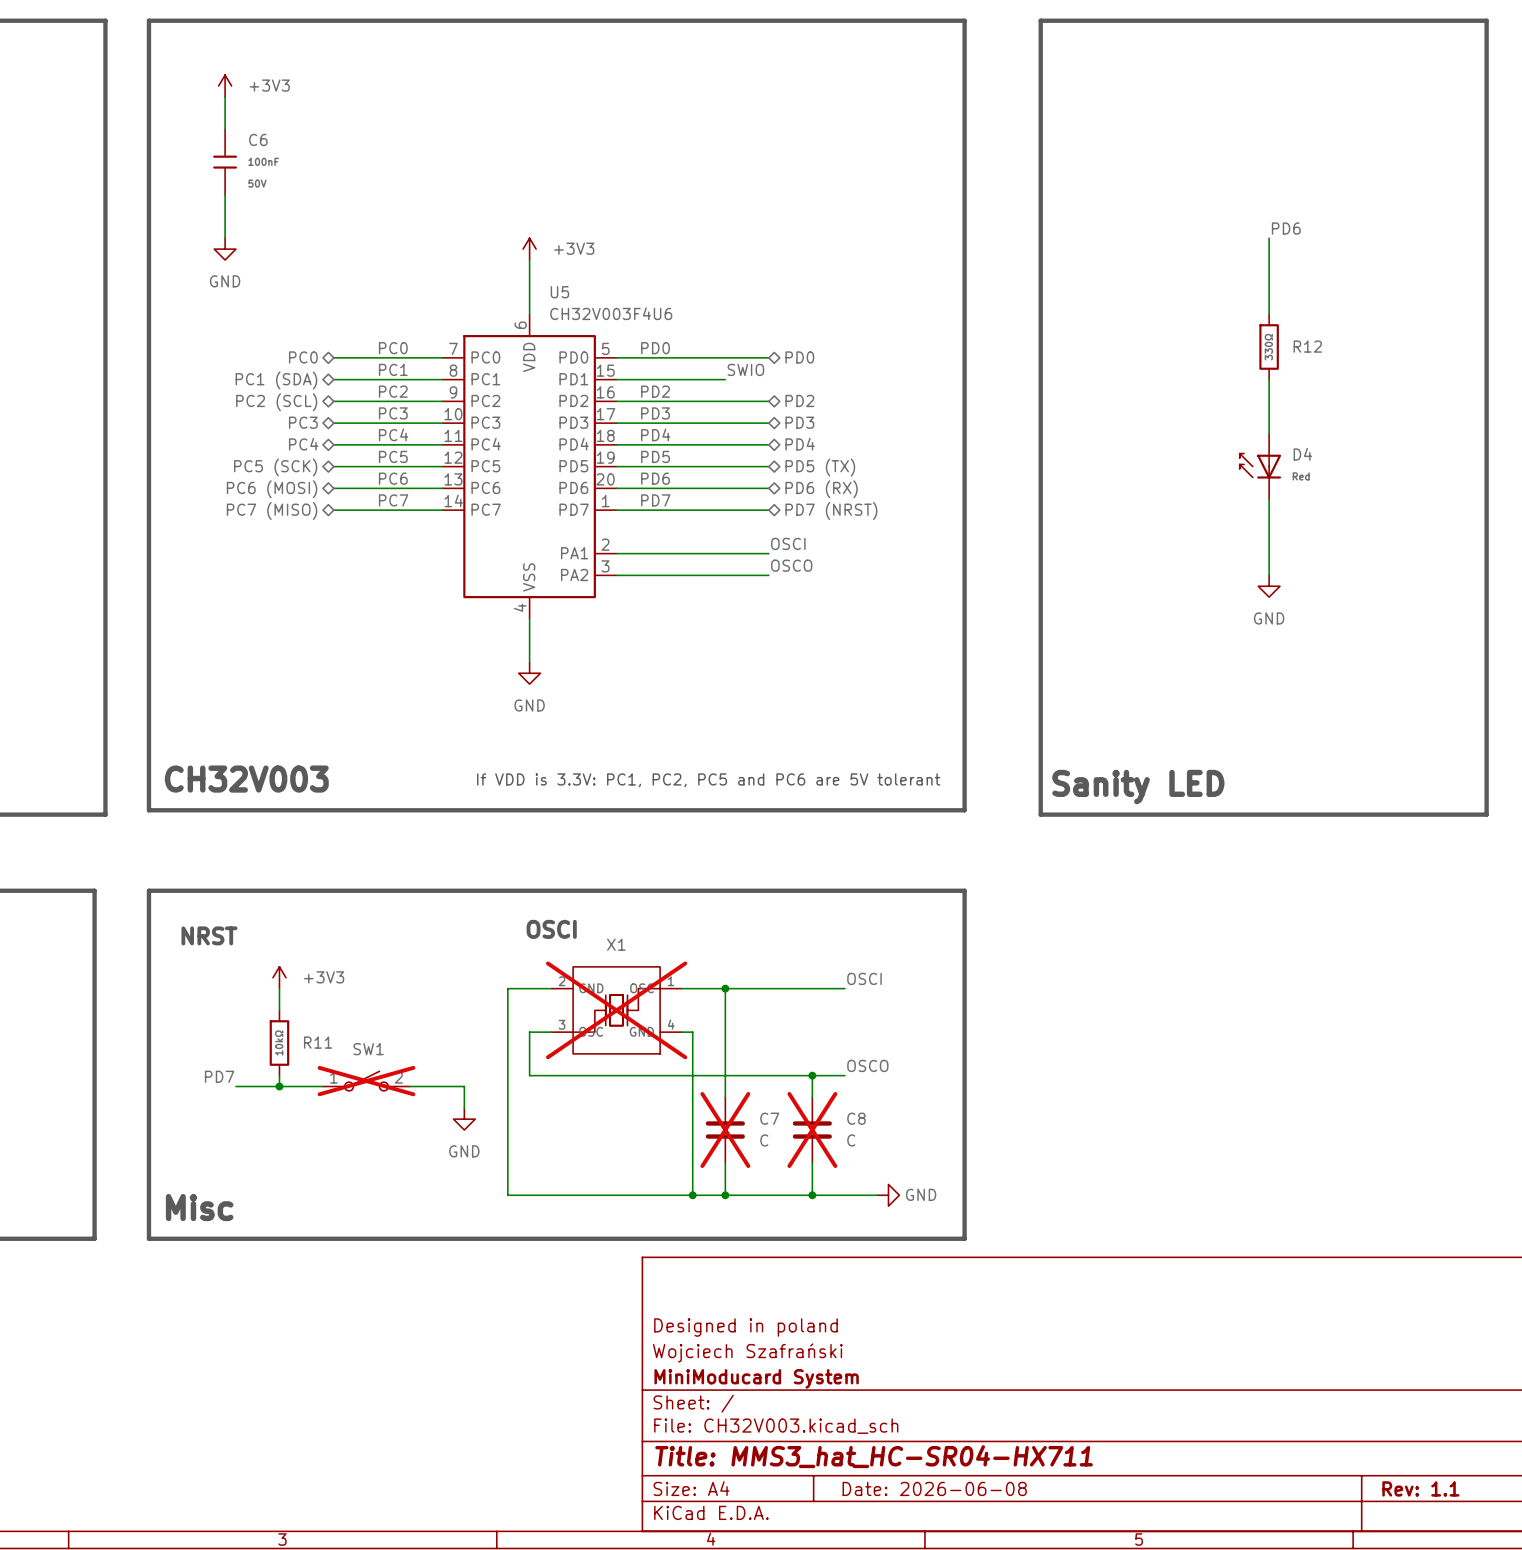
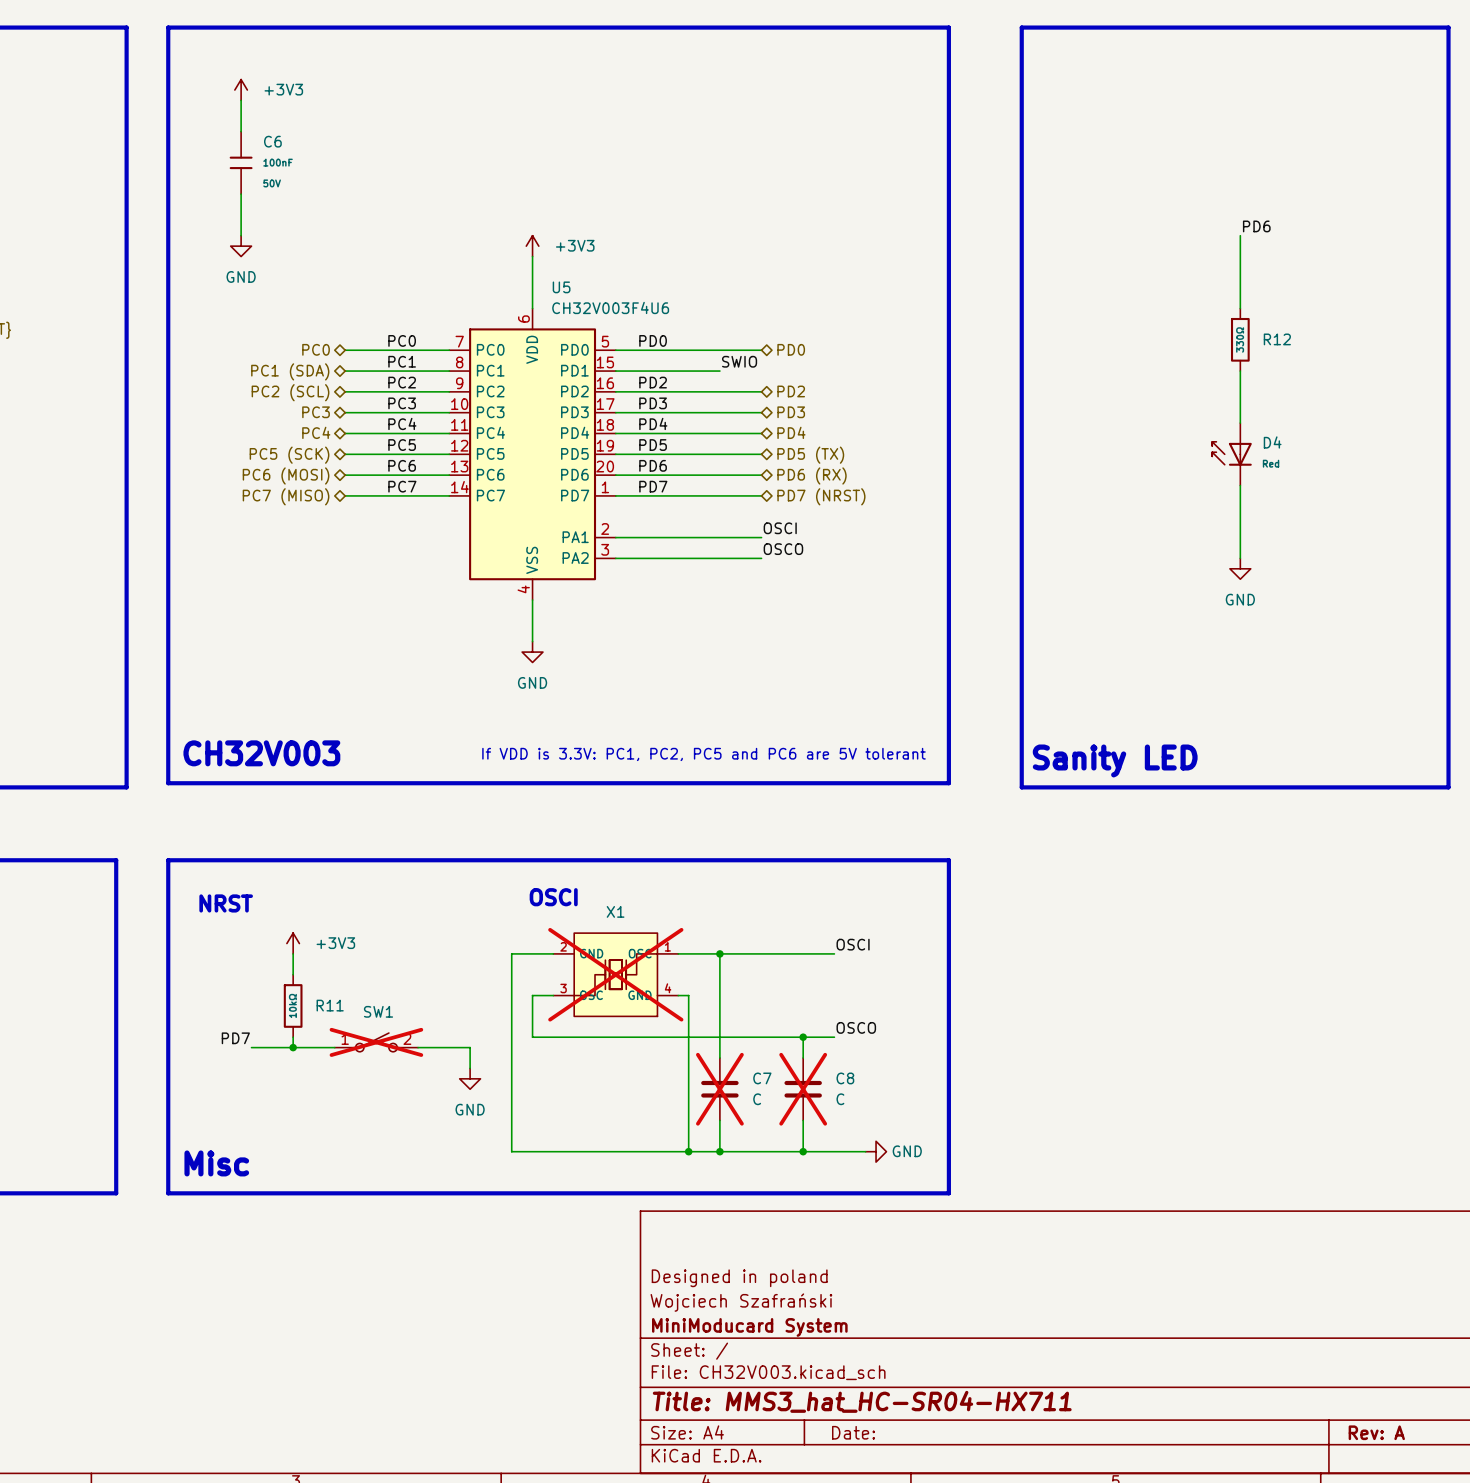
title block: Date: 2026-06-08 (934, 1488) -> Date: (853, 1432)
title block: Rev: 1.1 (1420, 1488) -> Rev: A (1376, 1432)

